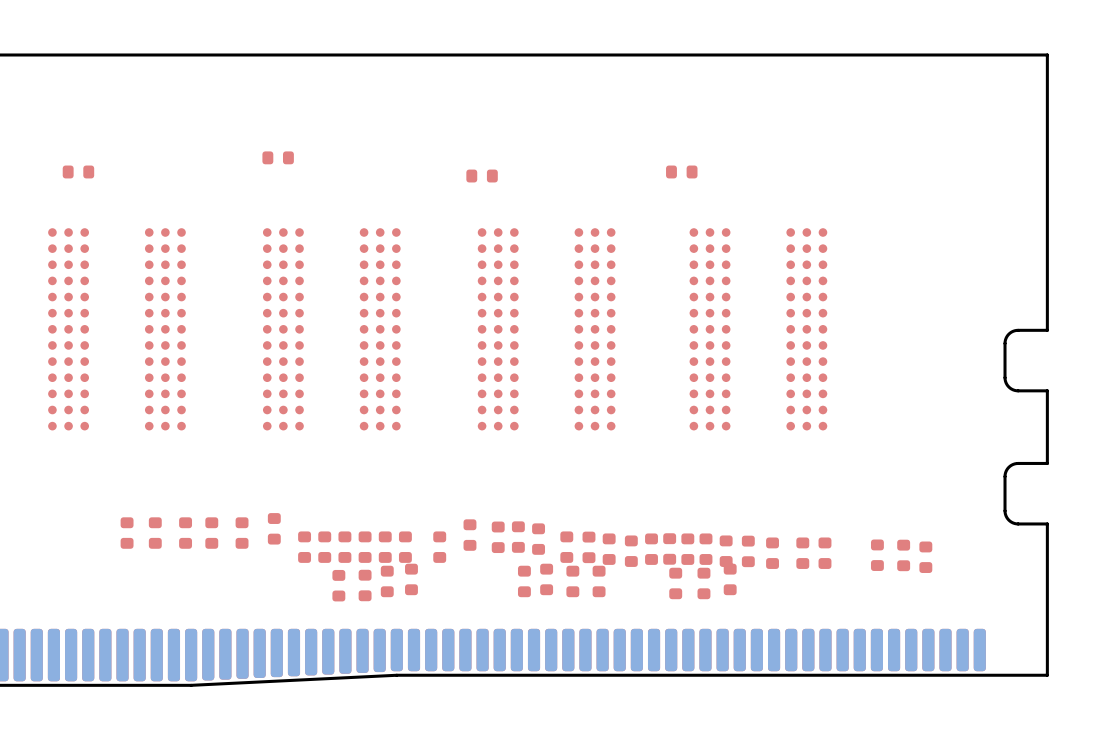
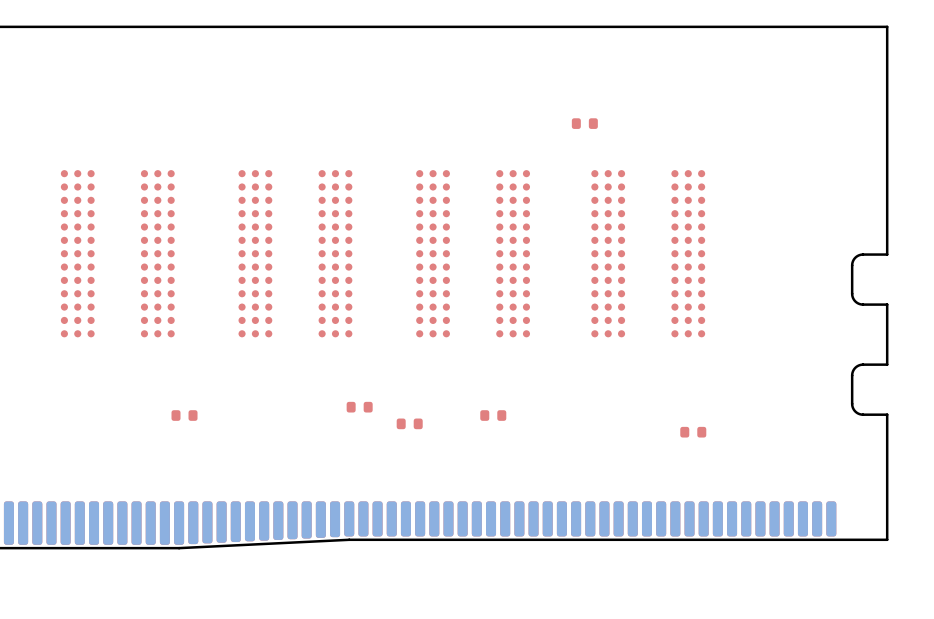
part: (278, 157) -> none
part: (78, 171) -> none
part: (482, 176) -> none
part: none -> (359, 407)
part: none -> (184, 415)
part: none -> (493, 415)
part: (274, 528) -> none
part: (127, 533) -> none
part: (155, 533) -> none
part: (185, 533) -> none
part: (211, 533) -> none
part: (242, 533) -> none
part rotation: 0° (469, 535) -> 90° clockwise (409, 423)
part: (498, 537) -> none
part: (518, 537) -> none
part: (538, 539) -> none
part: none -> (693, 432)
part: (304, 547) -> none
part: (324, 547) -> none
part: (344, 547) -> none
part: (365, 547) -> none
part: (385, 547) -> none
part: (405, 547) -> none
part: (439, 547) -> none
part: (566, 547) -> none
part: (588, 547) -> none
part: (669, 548) -> none
part: (609, 549) -> none
part: (651, 549) -> none
part: (687, 549) -> none
part: (705, 549) -> none
part: (631, 551) -> none
part: (726, 551) -> none
part: (748, 551) -> none
part: (772, 553) -> none
part: (802, 553) -> none
part: (824, 553) -> none
part: (877, 555) -> none
part: (903, 555) -> none
part: (925, 557) -> none
part: (411, 579) -> none
part: (546, 579) -> none
part: (730, 579) -> none
part: (387, 581) -> none
part: (524, 581) -> none
part: (572, 581) -> none
part: (599, 581) -> none
part: (675, 583) -> none
part: (703, 583) -> none
part: (338, 585) -> none
part: (365, 585) -> none

